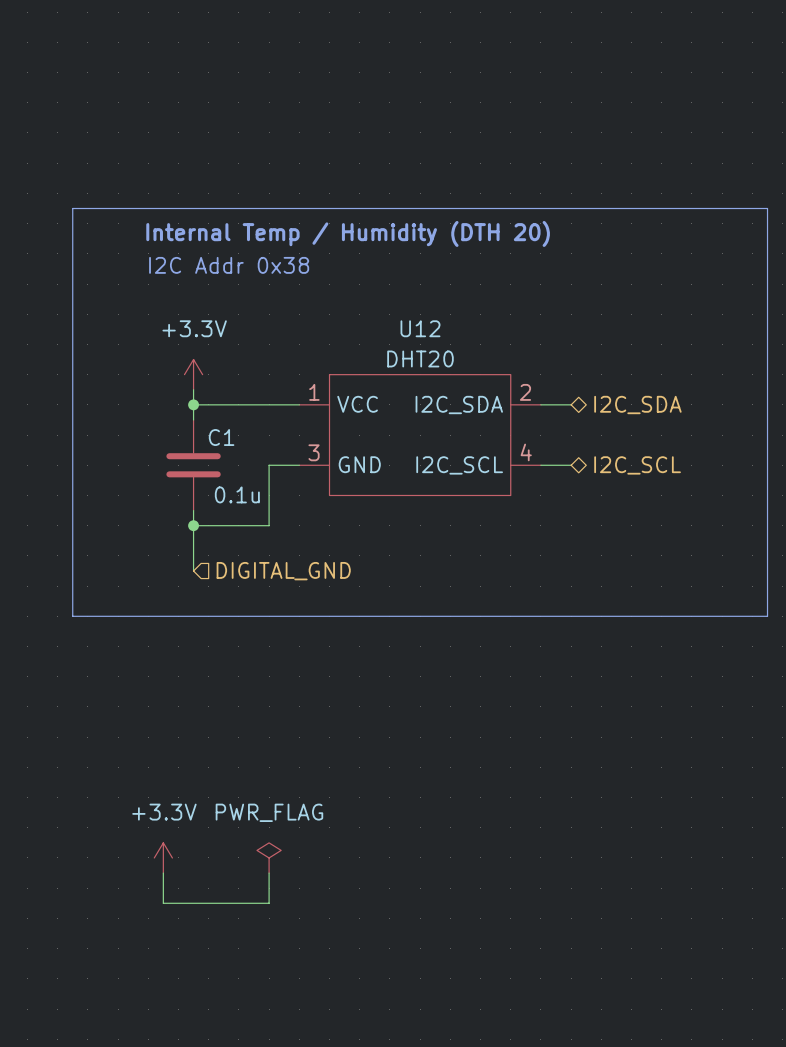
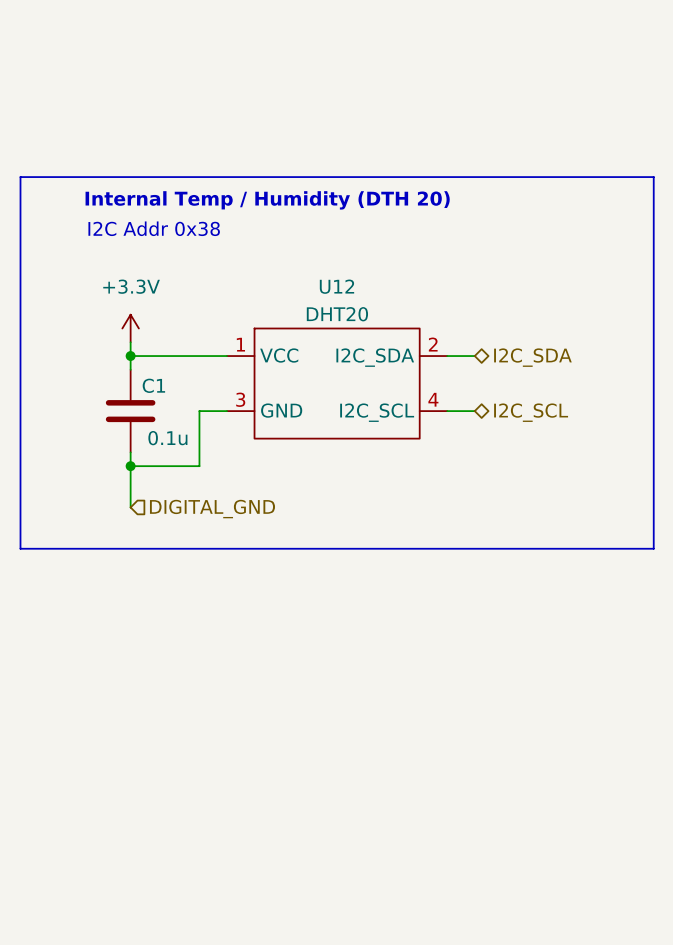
power symbol: +3.3V (163, 857) -> none
power symbol: PWR_FLAG (269, 857) -> none
wire: (163, 873) (163, 903) (269, 903) (269, 873) -> none

